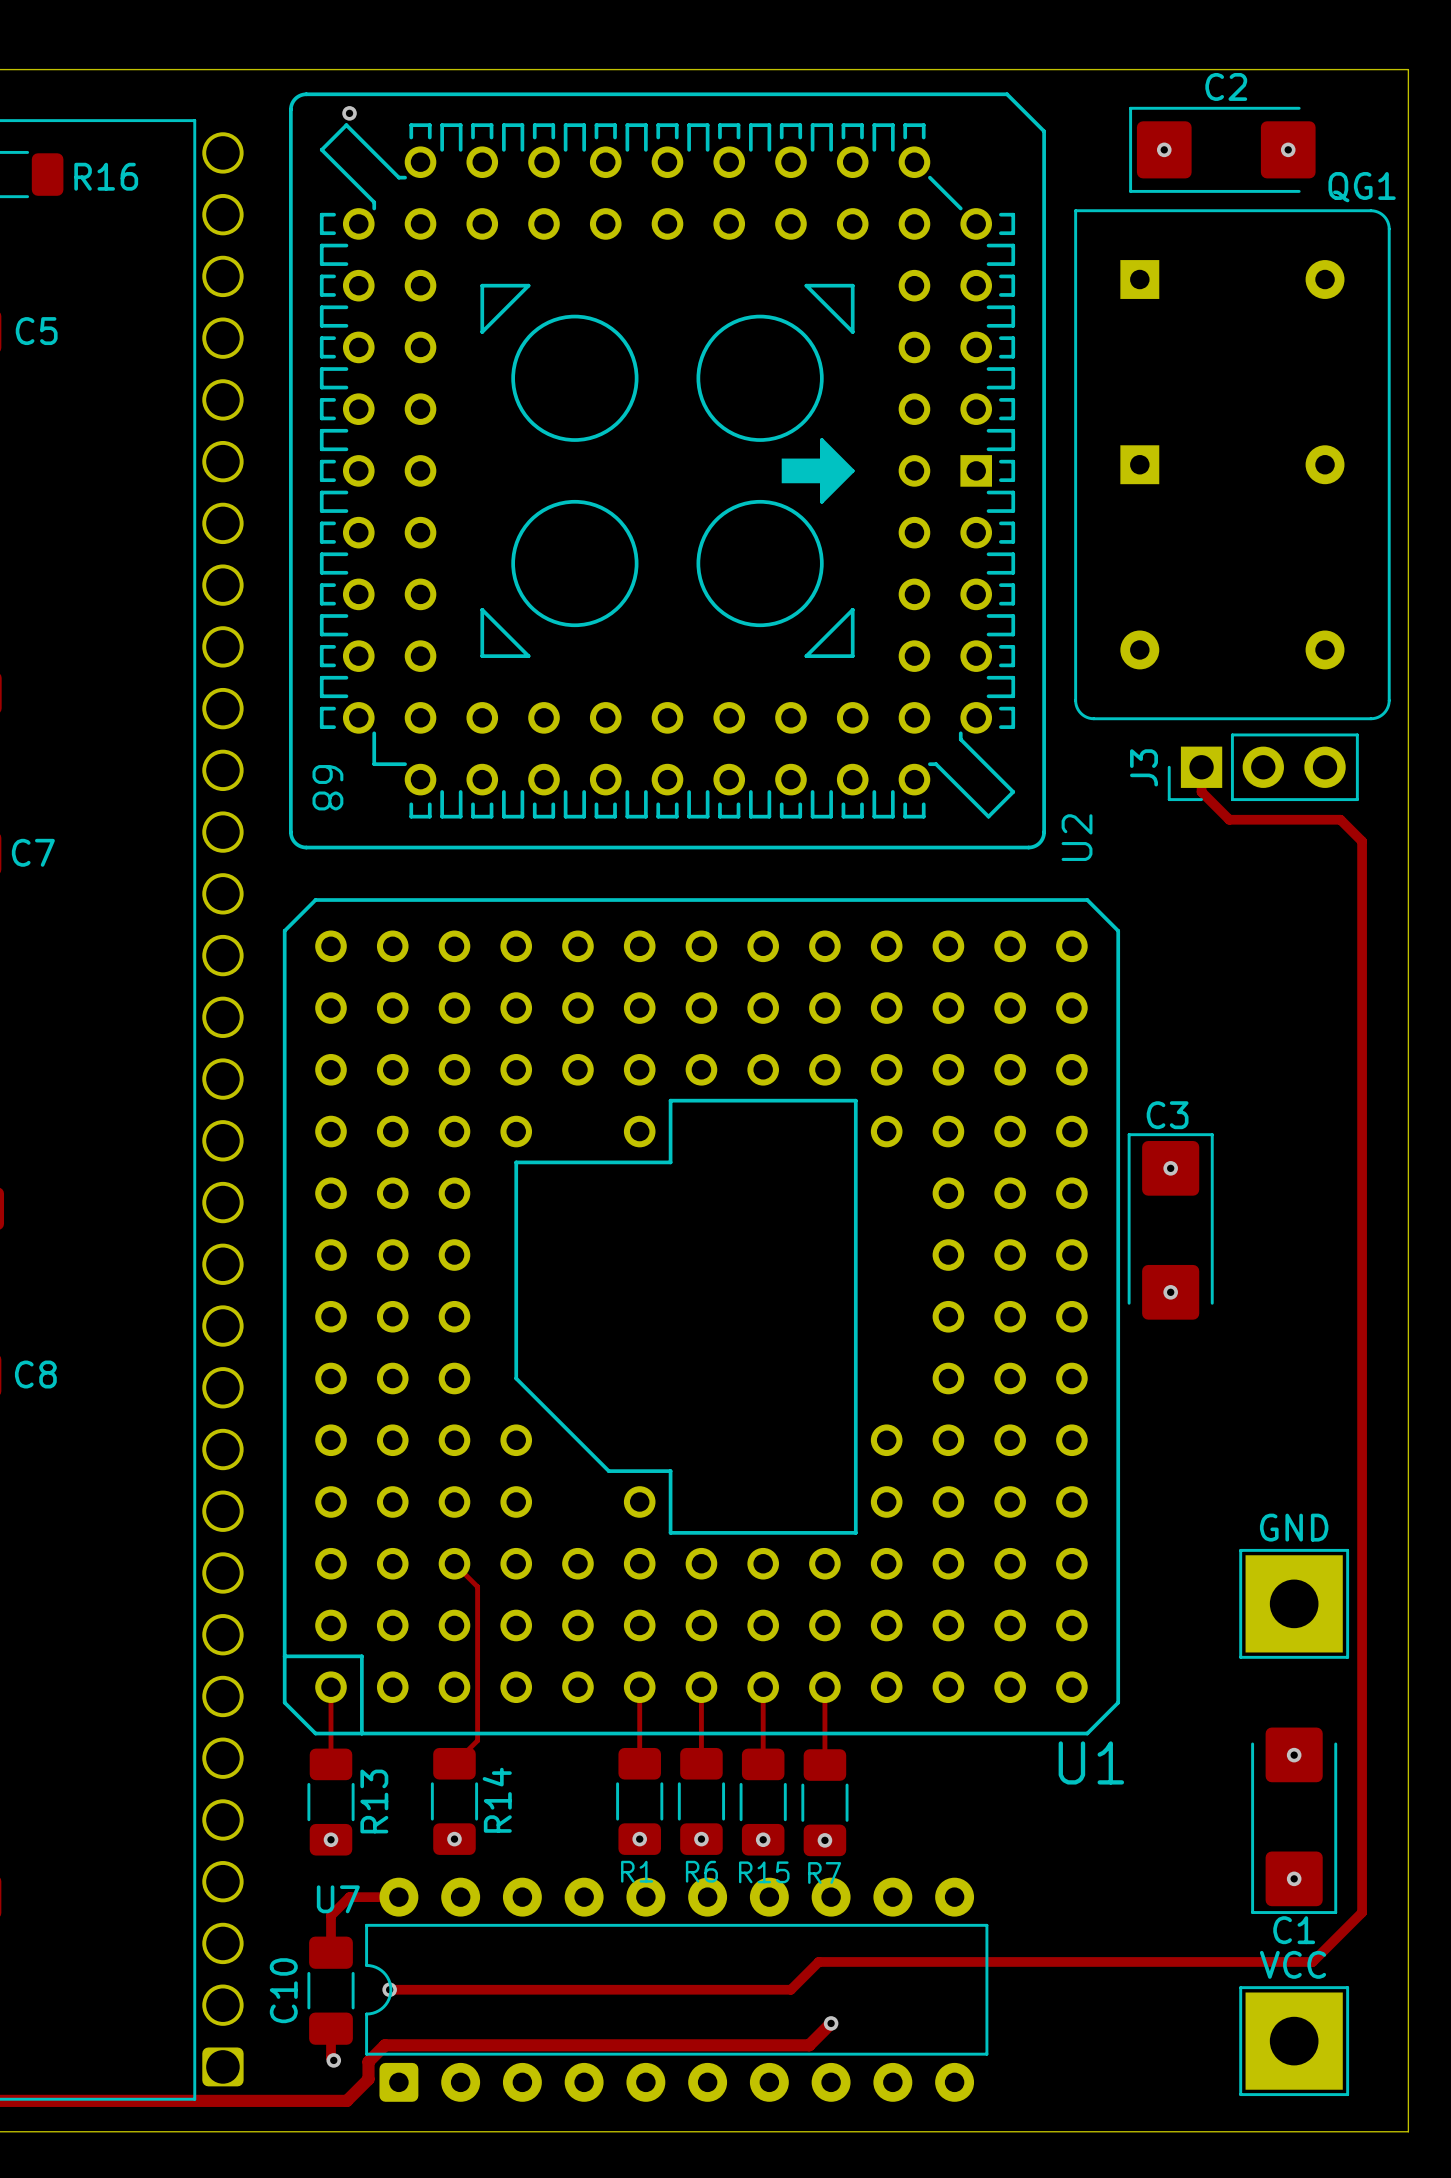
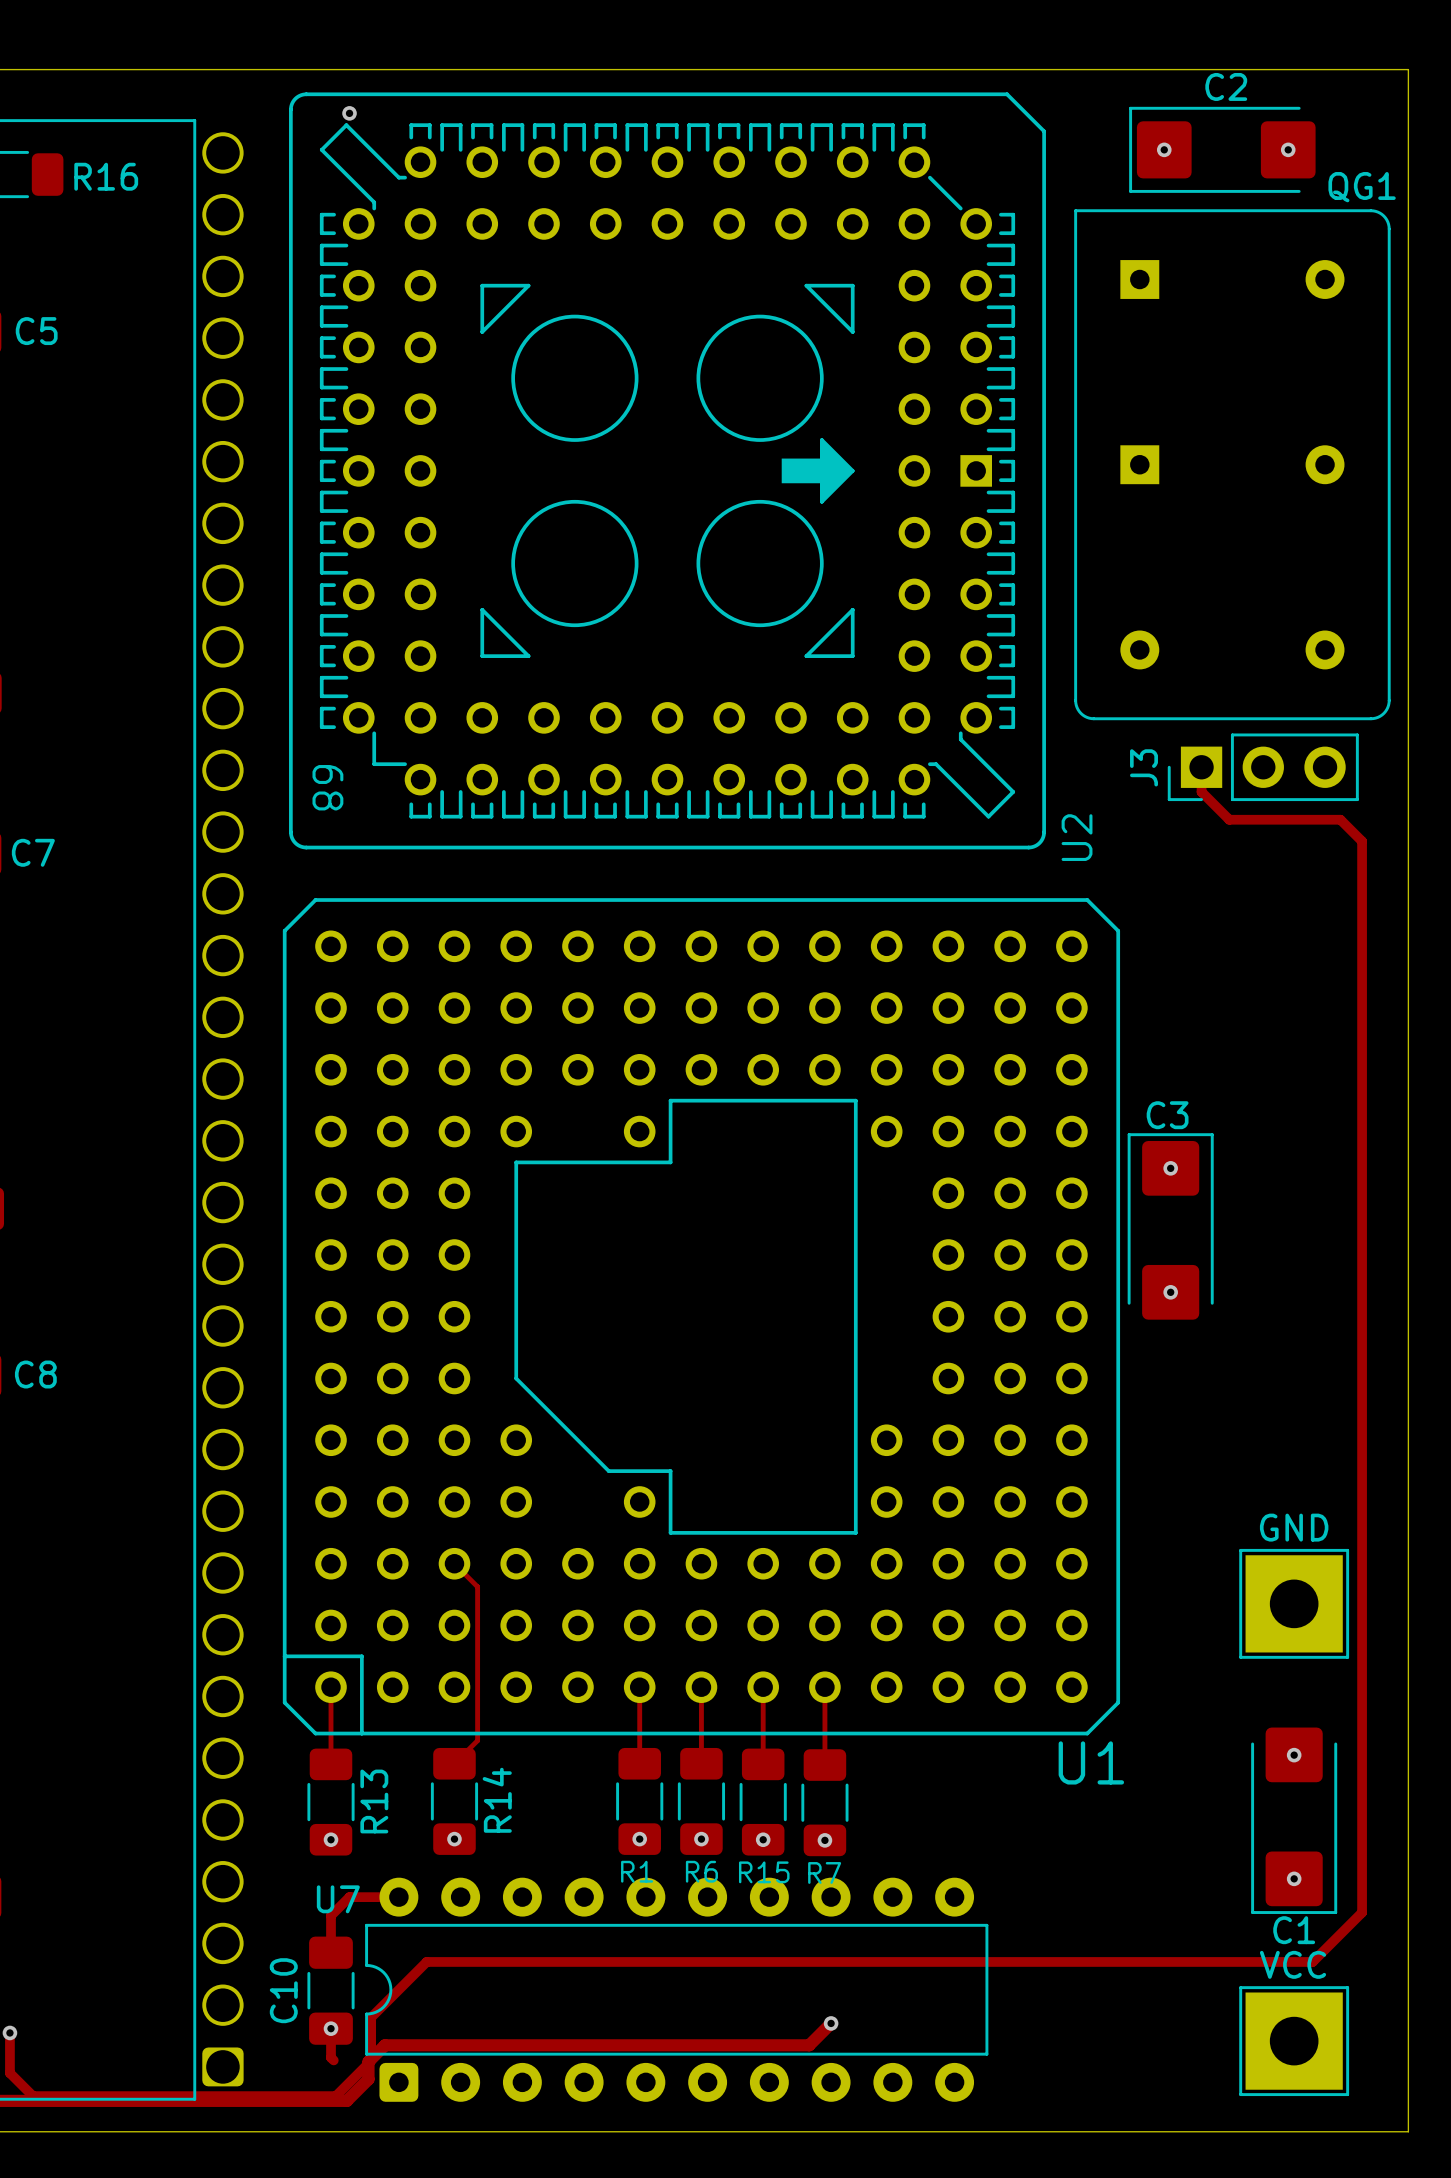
track: (818, 1961) (790, 1989) (389, 1989) -> (818, 1961) (426, 1961) (371, 2017) (371, 2060) (335, 2096) (32, 2096) (9, 2073) (9, 2032)
via: (389, 1989) -> none
via: none -> (9, 2032)
via position: (333, 2060) -> (331, 2028)

